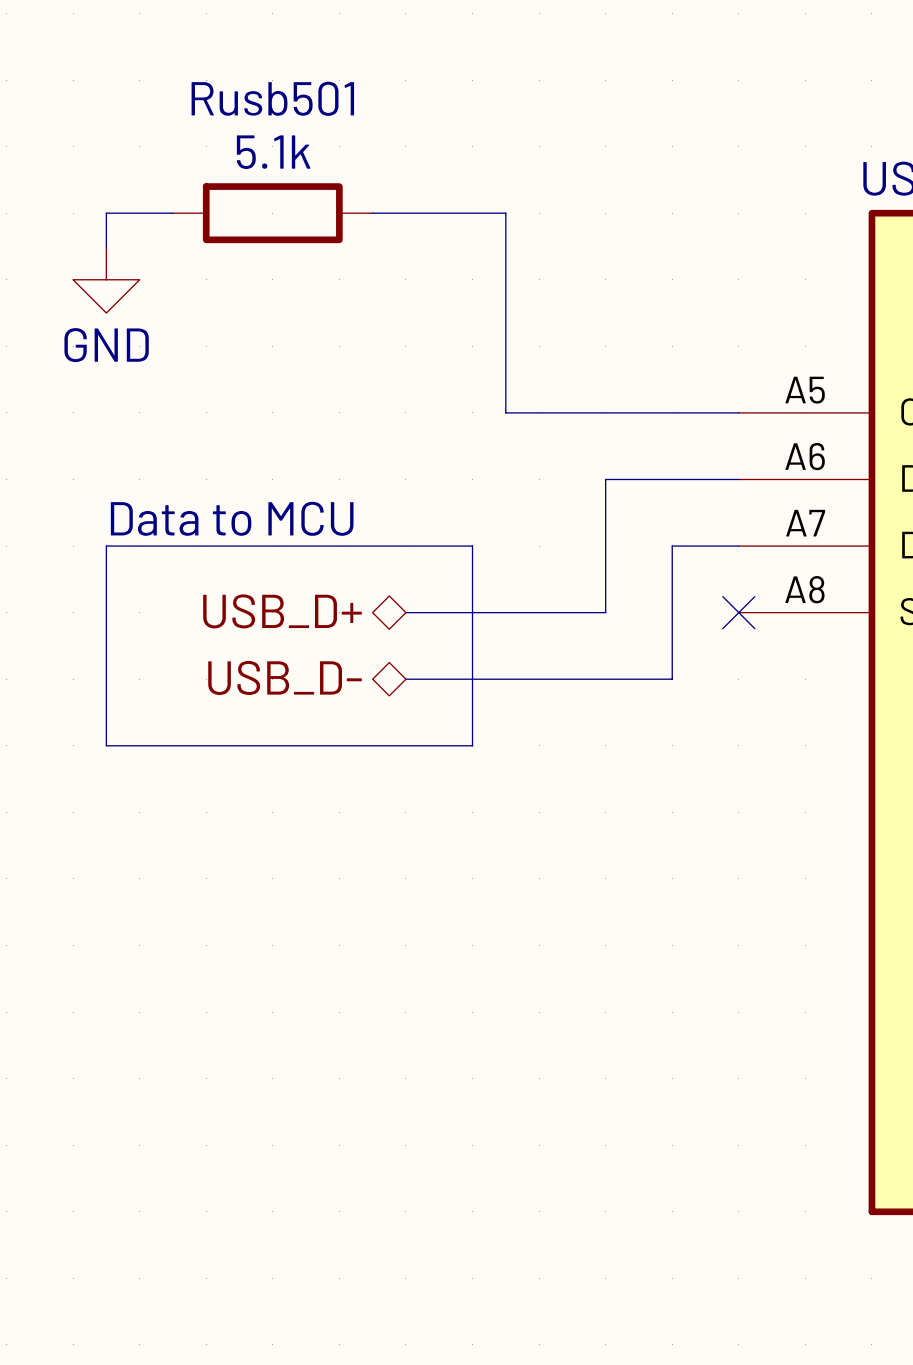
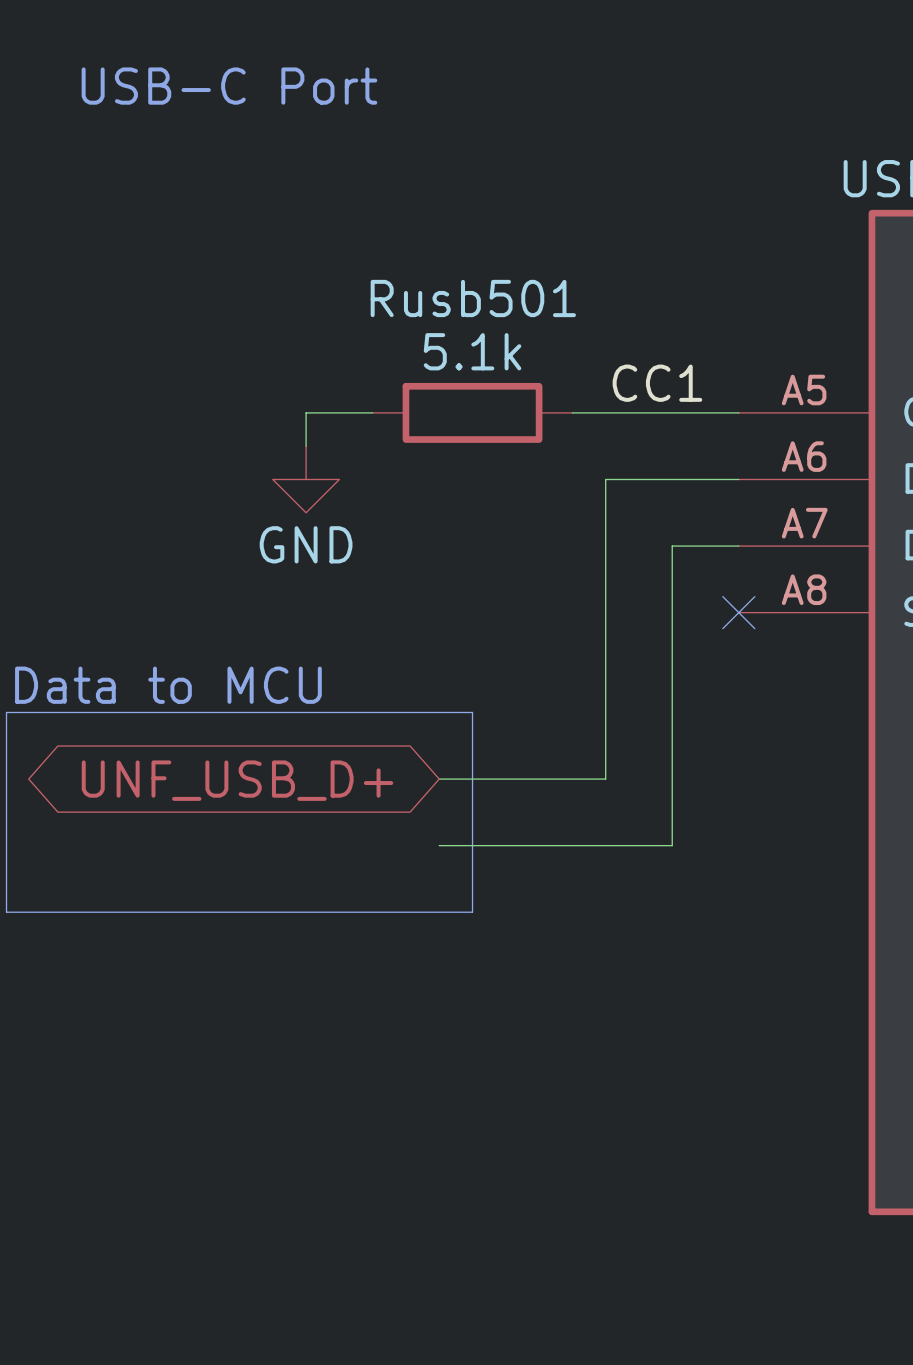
text: none -> USB-C Port (229, 86)
wire: (172, 213) (106, 213) (106, 246) -> (372, 412) (306, 412) (306, 446)
Rusb501 position: (272, 213) -> (472, 412)
wire: (372, 213) (505, 213) (505, 412) (572, 412) -> none
power symbol position: GND (106, 279) -> GND (306, 479)
label: none -> CC1 (657, 383)
text position: Data to MCU (232, 518) -> Data to MCU (168, 685)
hierarchical label: USB_D+ (282, 611) -> none
wire: (405, 612) (605, 612) -> (439, 779) (605, 779) (605, 612)
hierarchical label: USB_D- (285, 677) -> none
wire: (405, 679) (672, 679) -> (439, 845) (672, 845) (672, 679)
line: (472, 712) (472, 546) (106, 546) (106, 745) (472, 745) -> (472, 712) (6, 712) (6, 912) (472, 912) (472, 745)
global label: none -> UNF_USB_D+ (237, 780)

